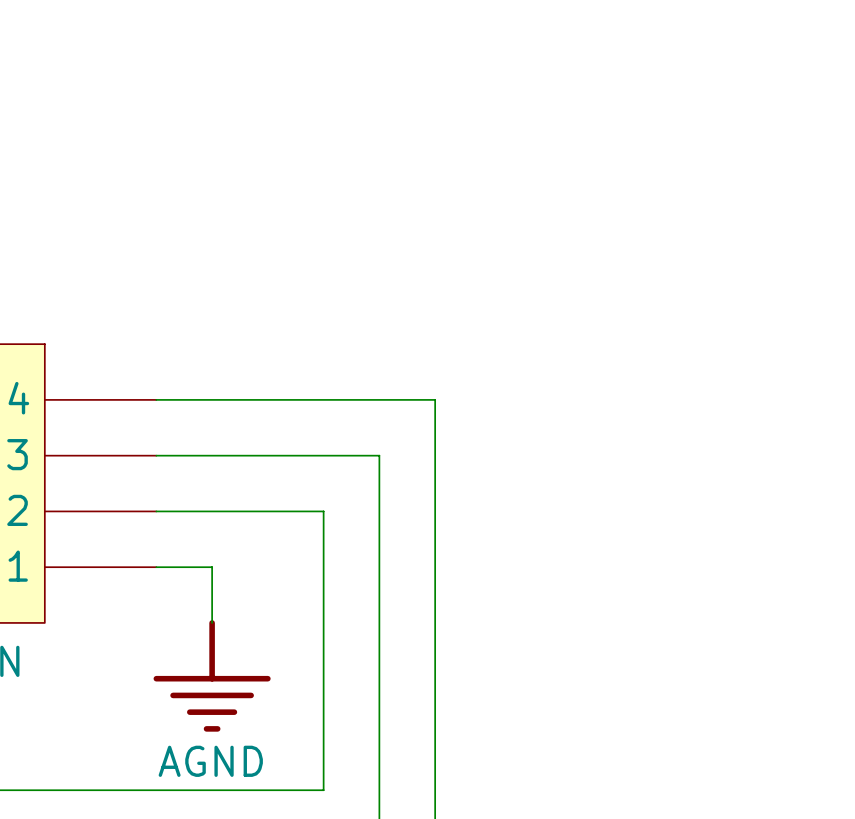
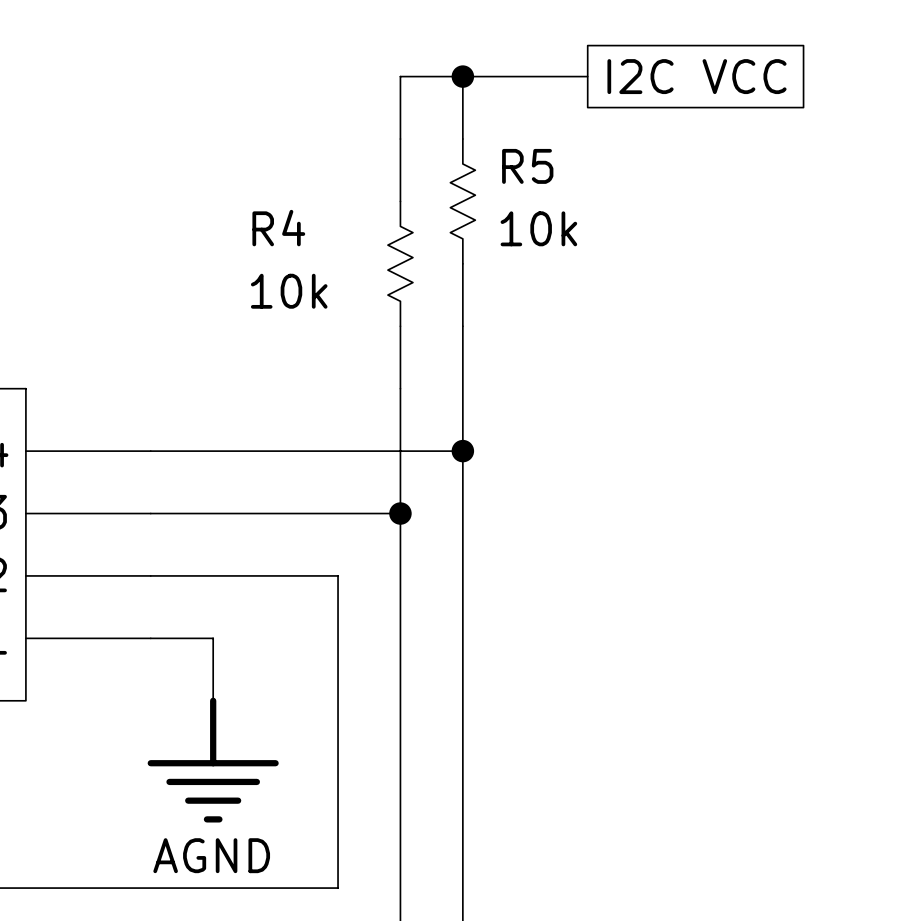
junction: none -> (462, 76)
wire: none -> (587, 76) (400, 76) (400, 139)
global label: none -> I2C VCC (696, 76)
R5: none -> 10k (462, 201)
R4: none -> 10k (400, 263)
wire: none -> (462, 326) (462, 451)
wire: none -> (400, 388) (400, 513)
junction: none -> (462, 451)
junction: none -> (400, 513)

